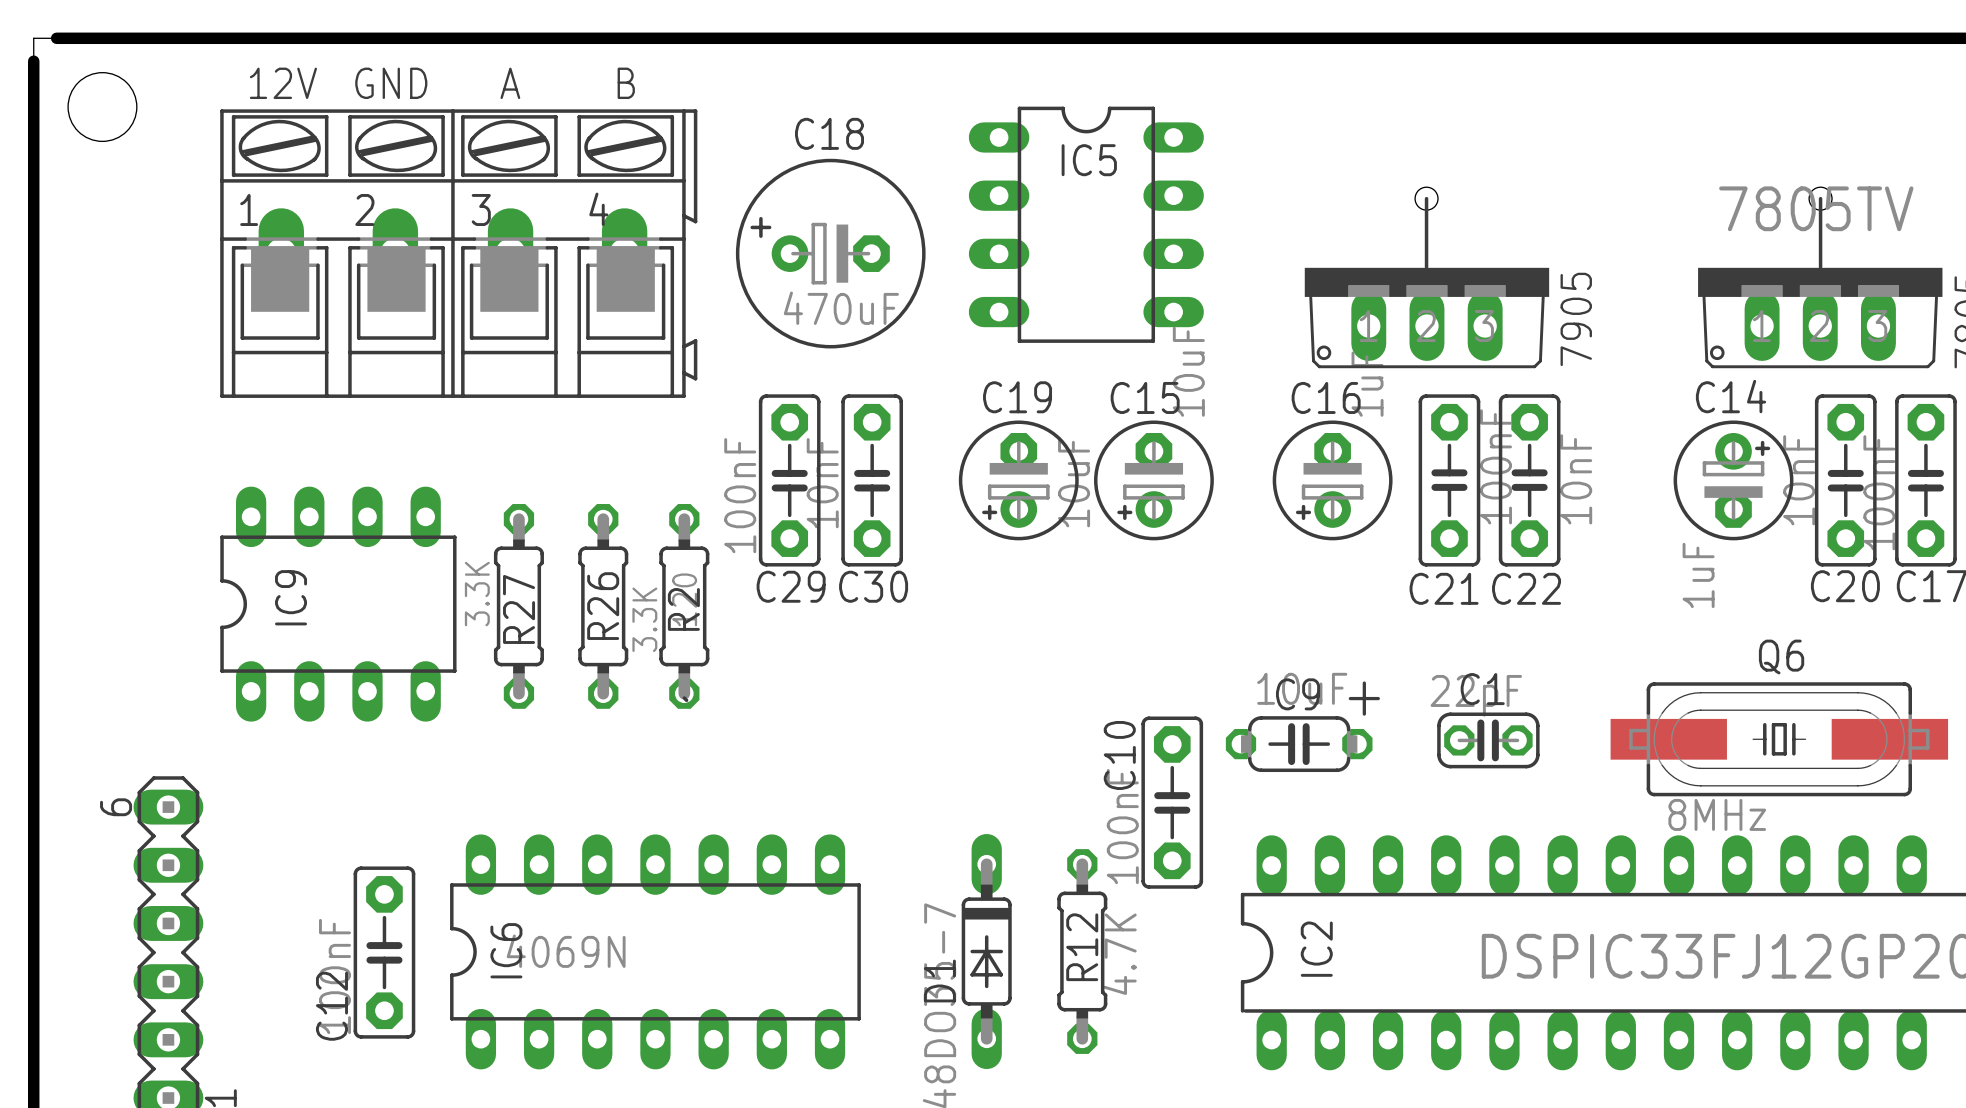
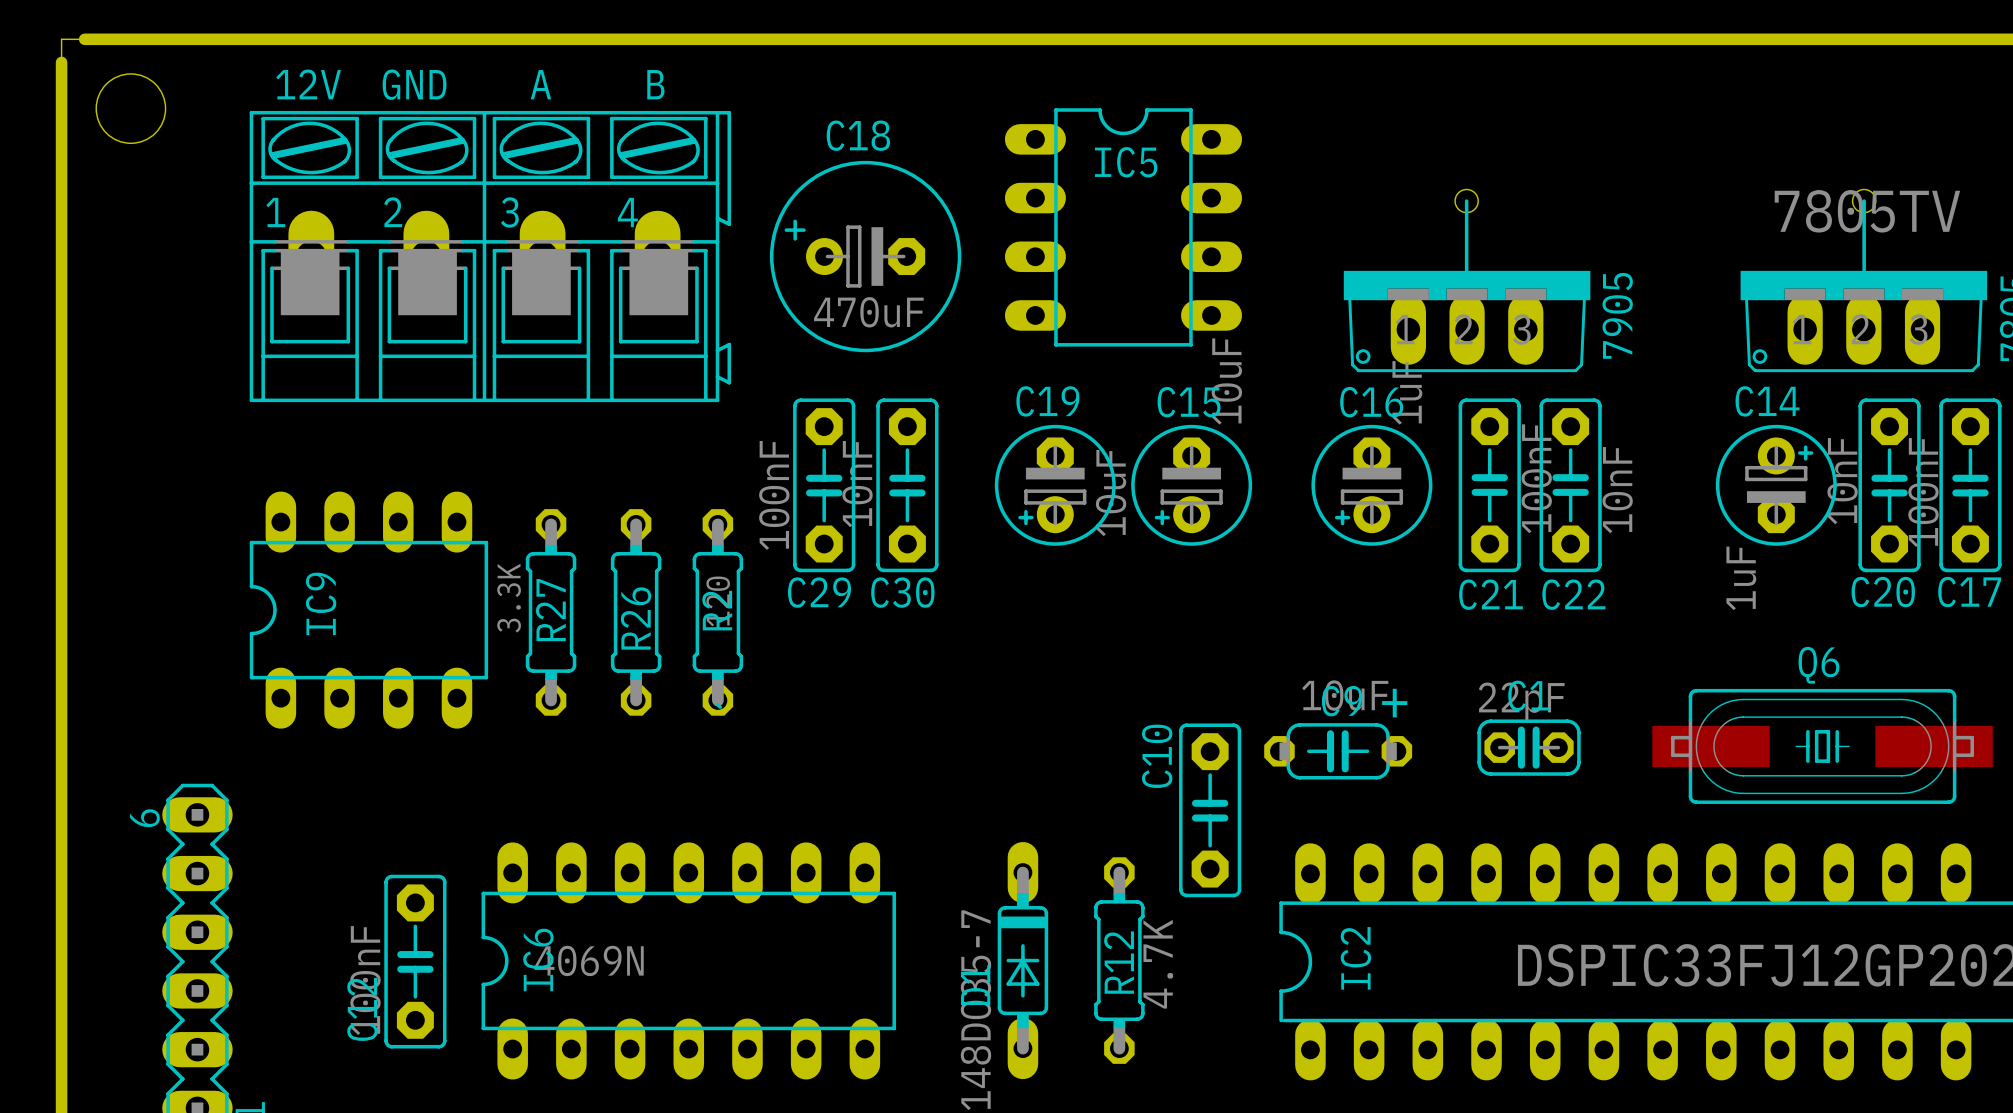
R26 value: 3.3K (644, 619) -> none
Q6 value: 8MHz (1717, 814) -> none
C10 value: 100nF (1122, 826) -> none

